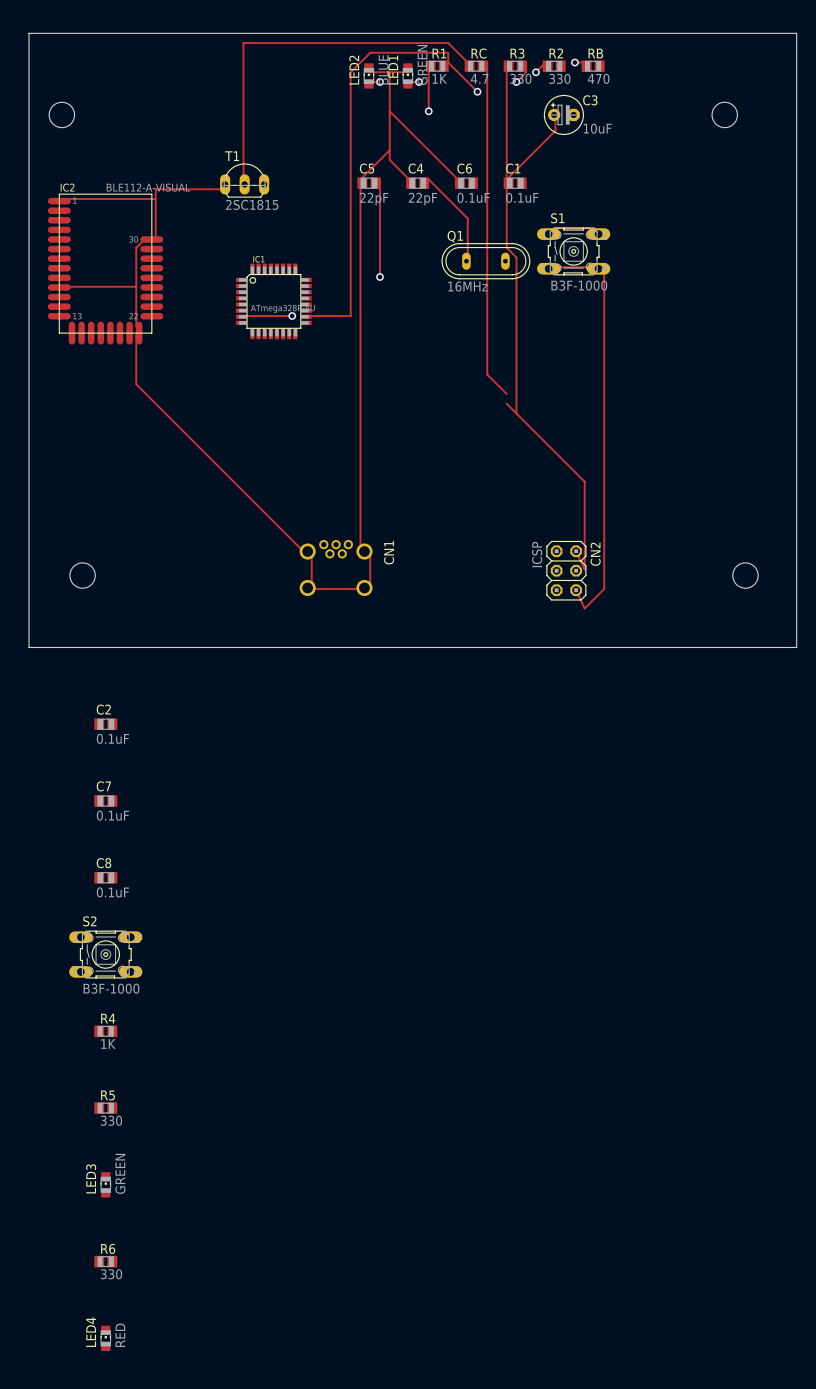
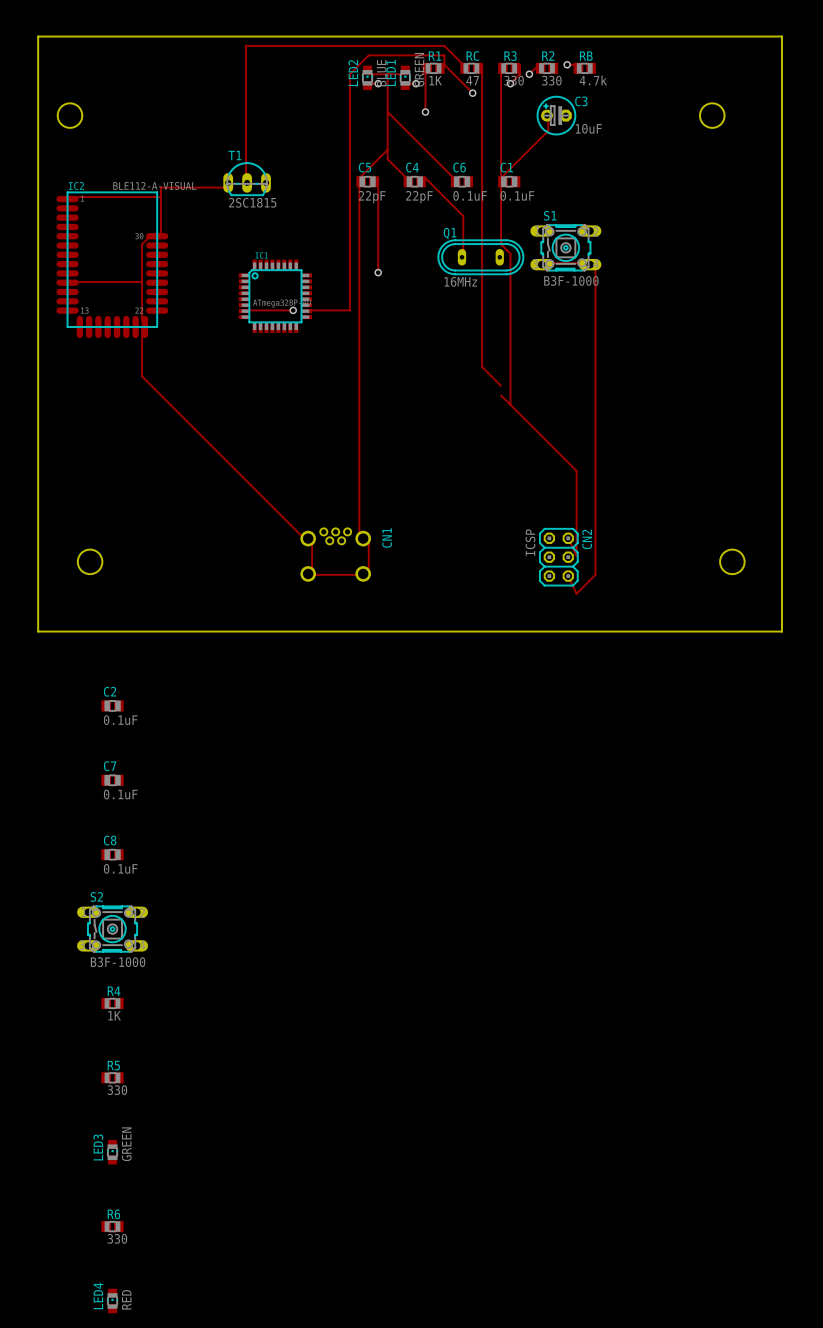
RC value: 4.7 (479, 78) -> 47 (472, 80)
RB value: 470 (598, 78) -> 4.7k (593, 80)

